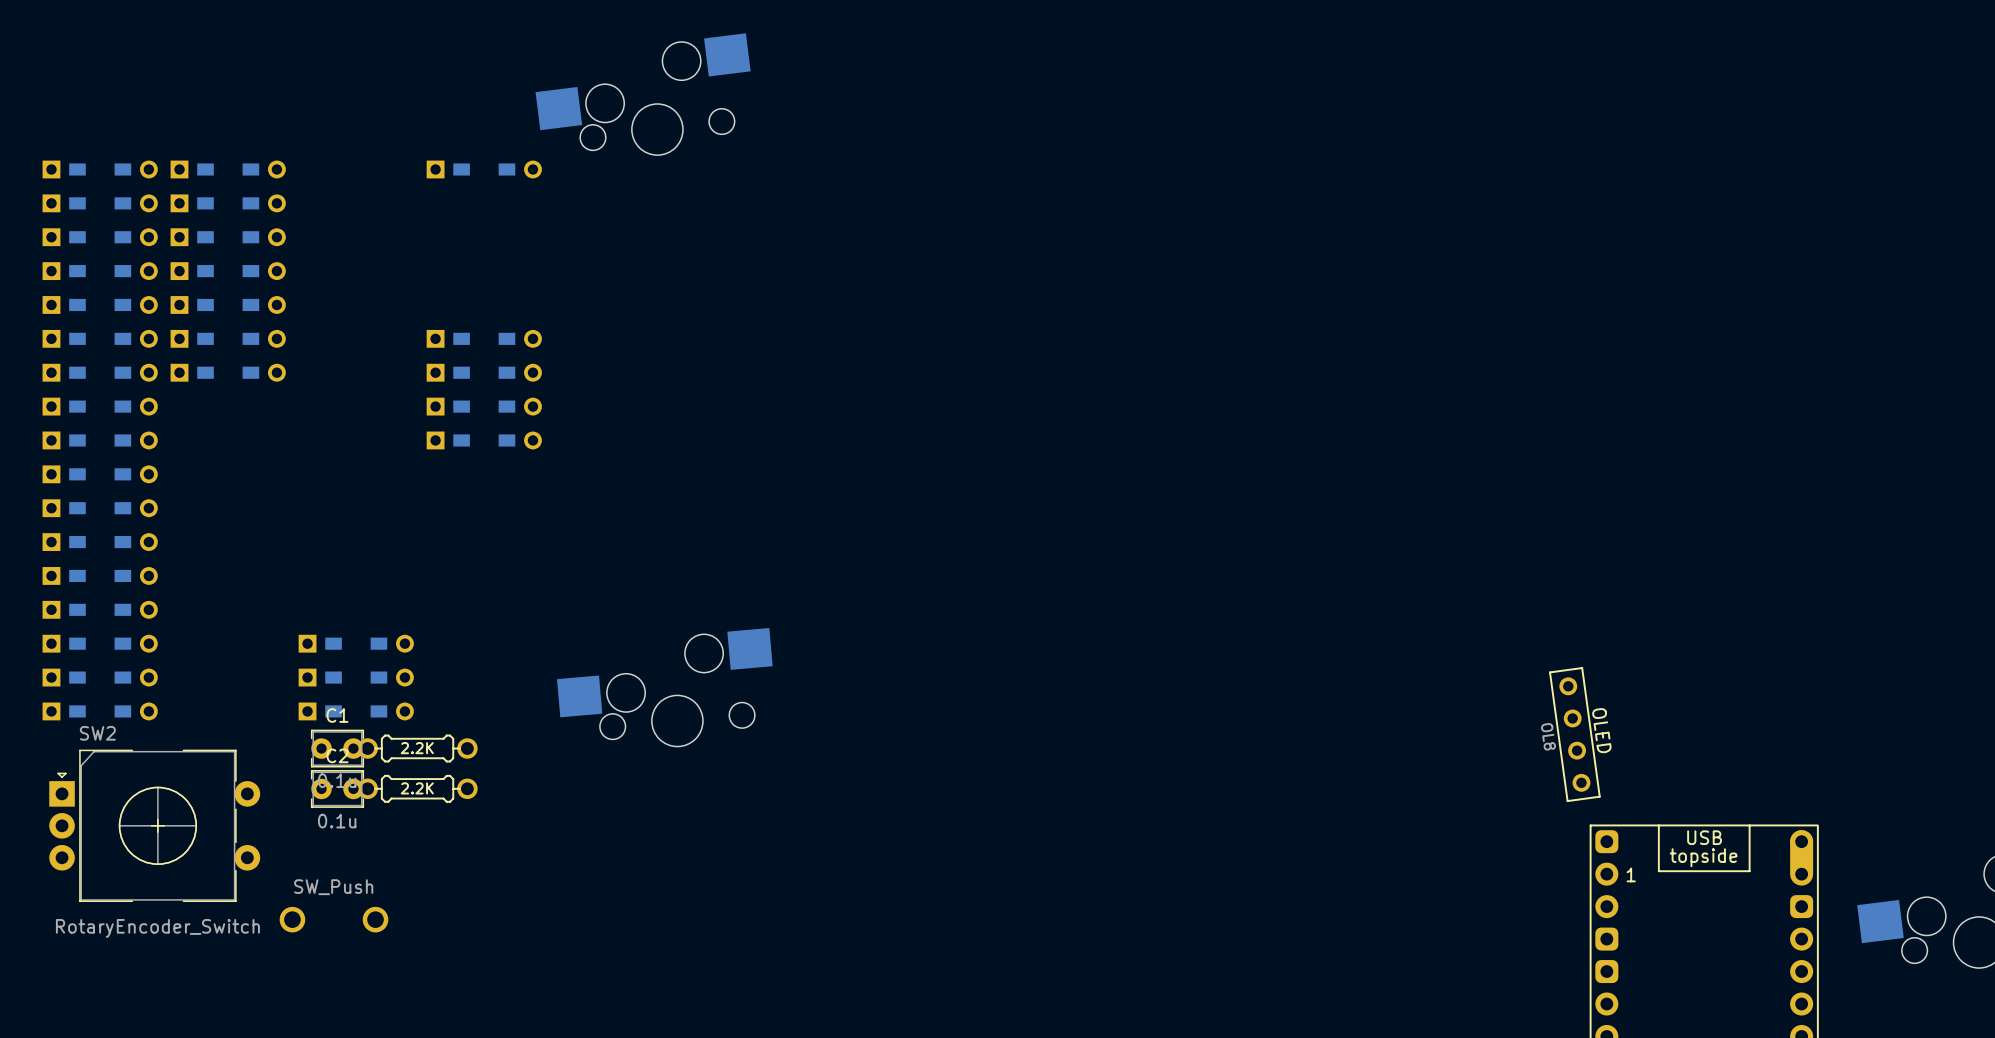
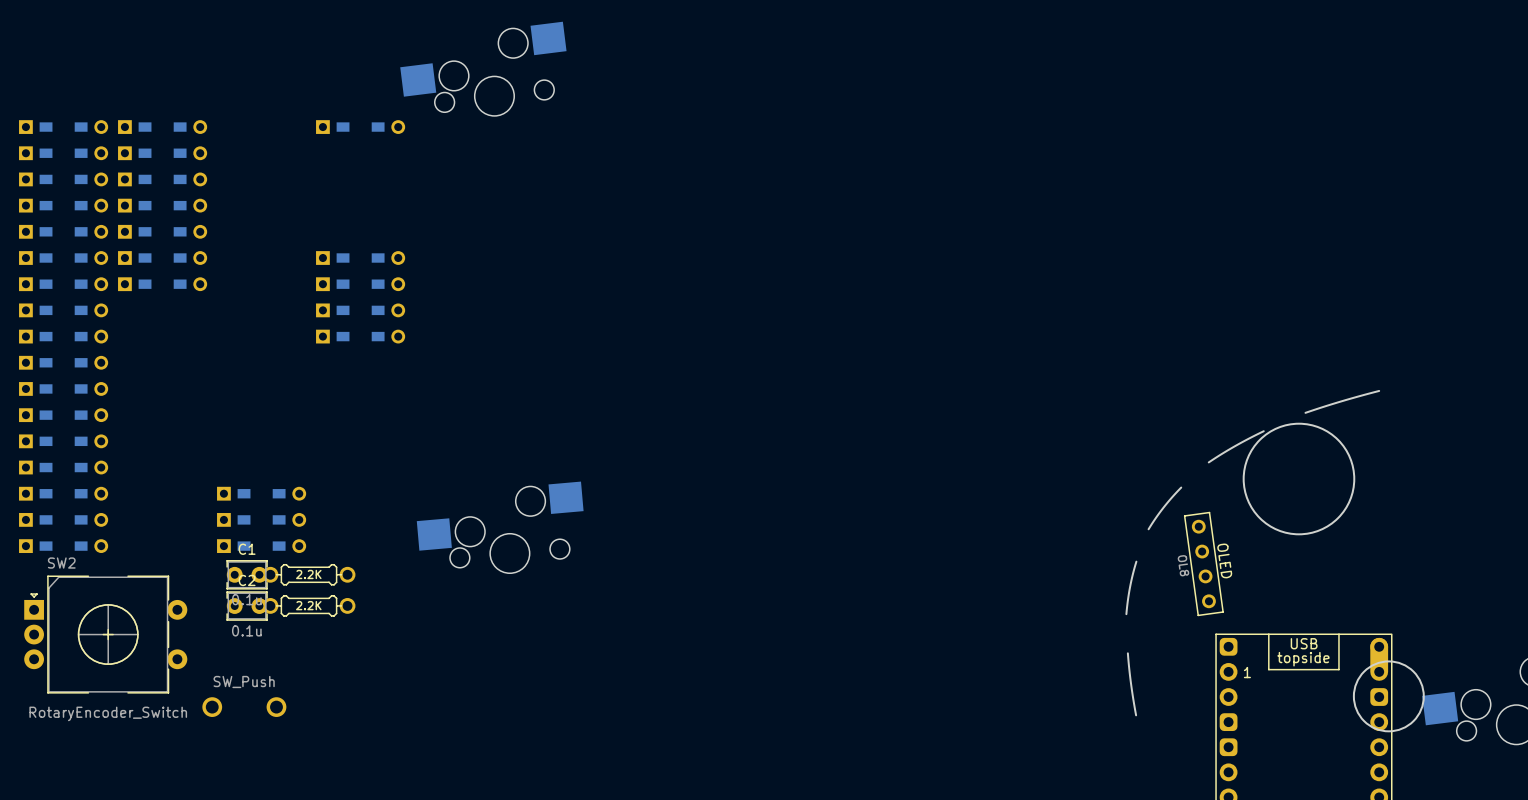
board edge: none -> (1379, 390) (1305, 412)
round board edge: none -> [1242, 422, 1356, 536]
board edge: none -> (1263, 431) (1208, 462)
board edge: none -> (1181, 487) (1163, 507) (1148, 529)
board edge: none -> (1136, 561) (1126, 614)
board edge: none -> (1127, 653) (1136, 715)
round board edge: none -> [1352, 660, 1425, 733]

